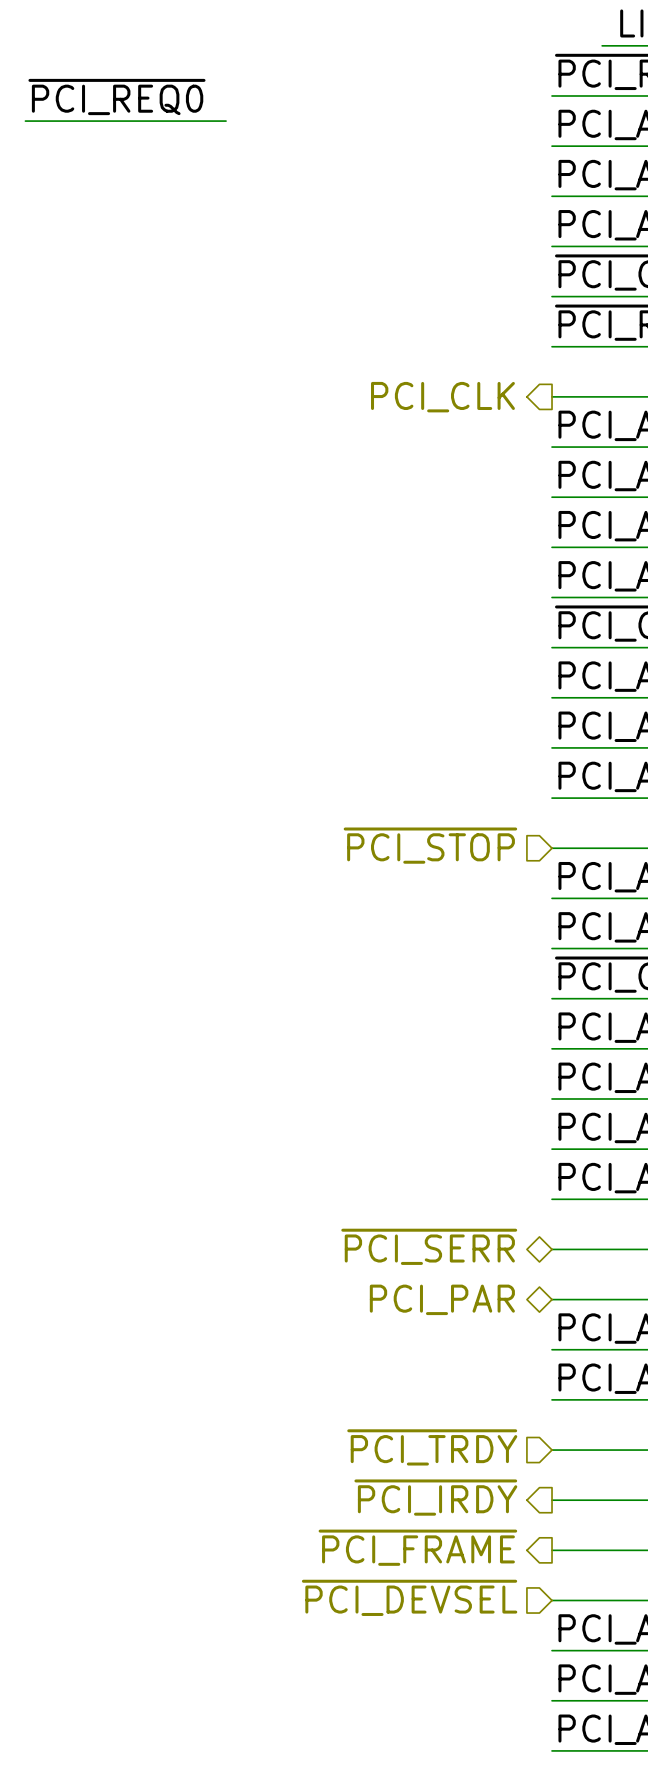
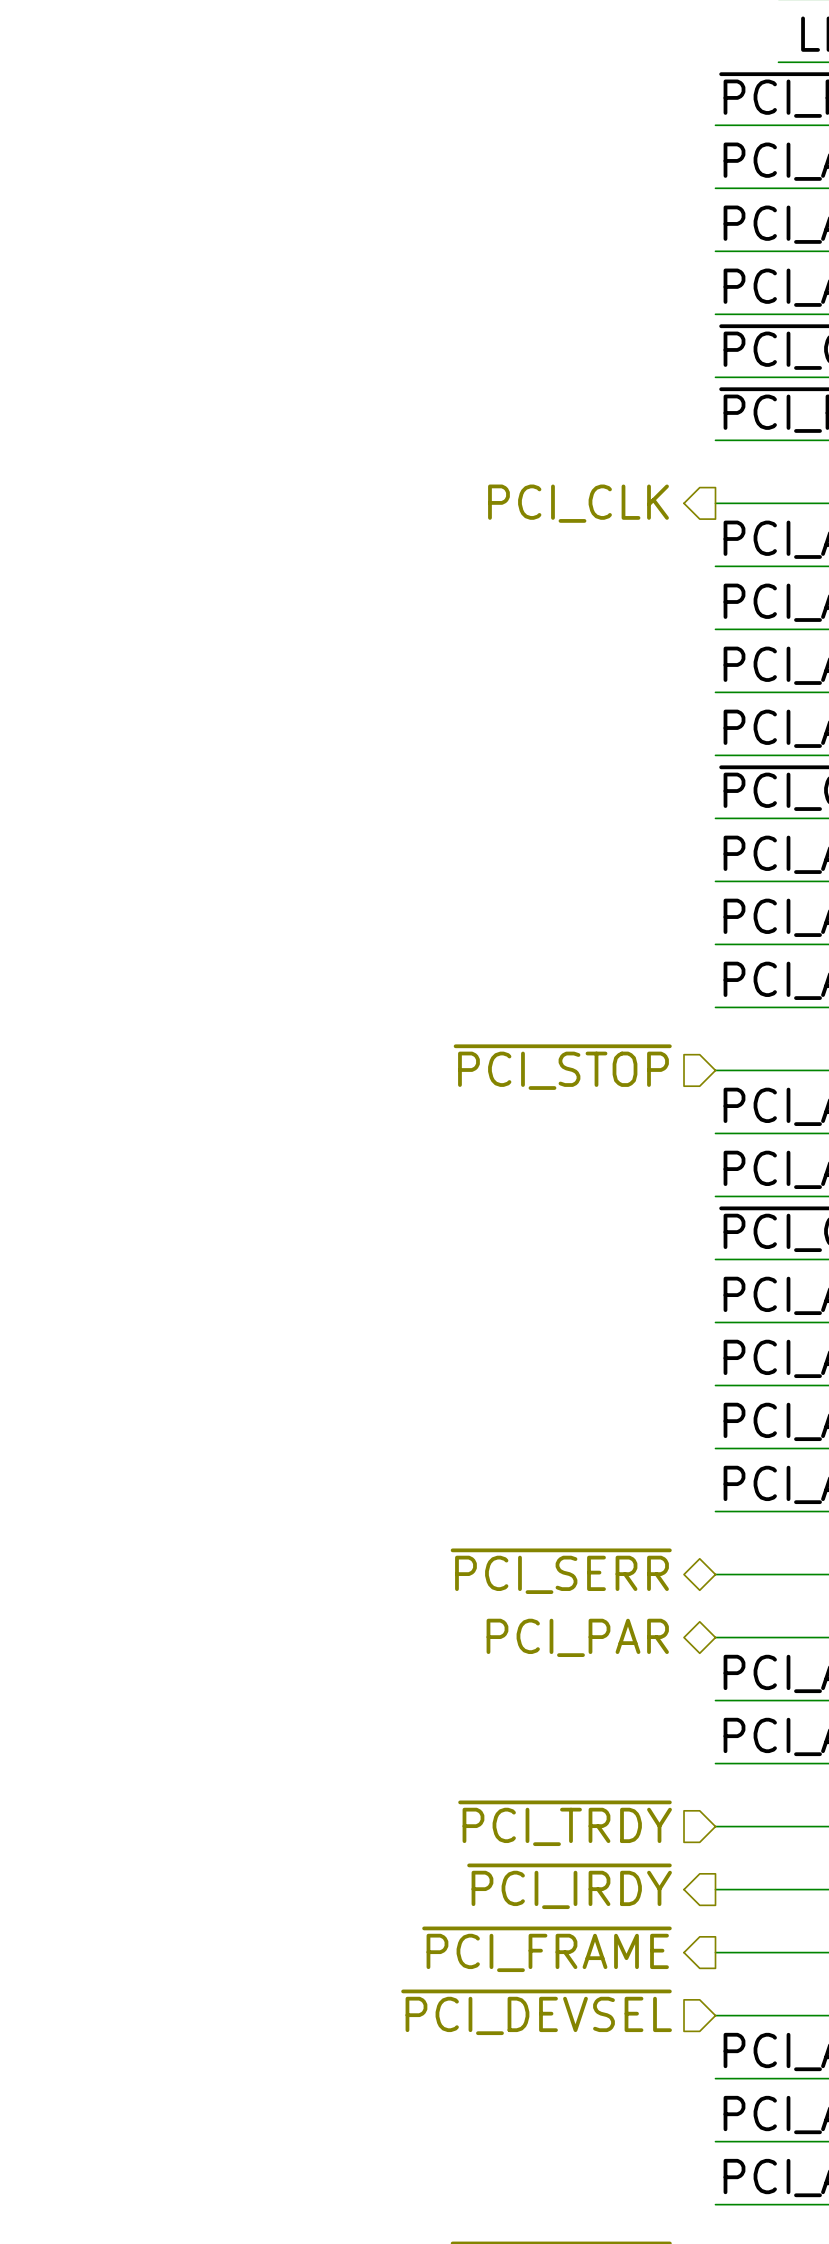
label: ~{PCI_REQ0} (116, 97) -> none
wire: (25, 121) (226, 121) -> none

